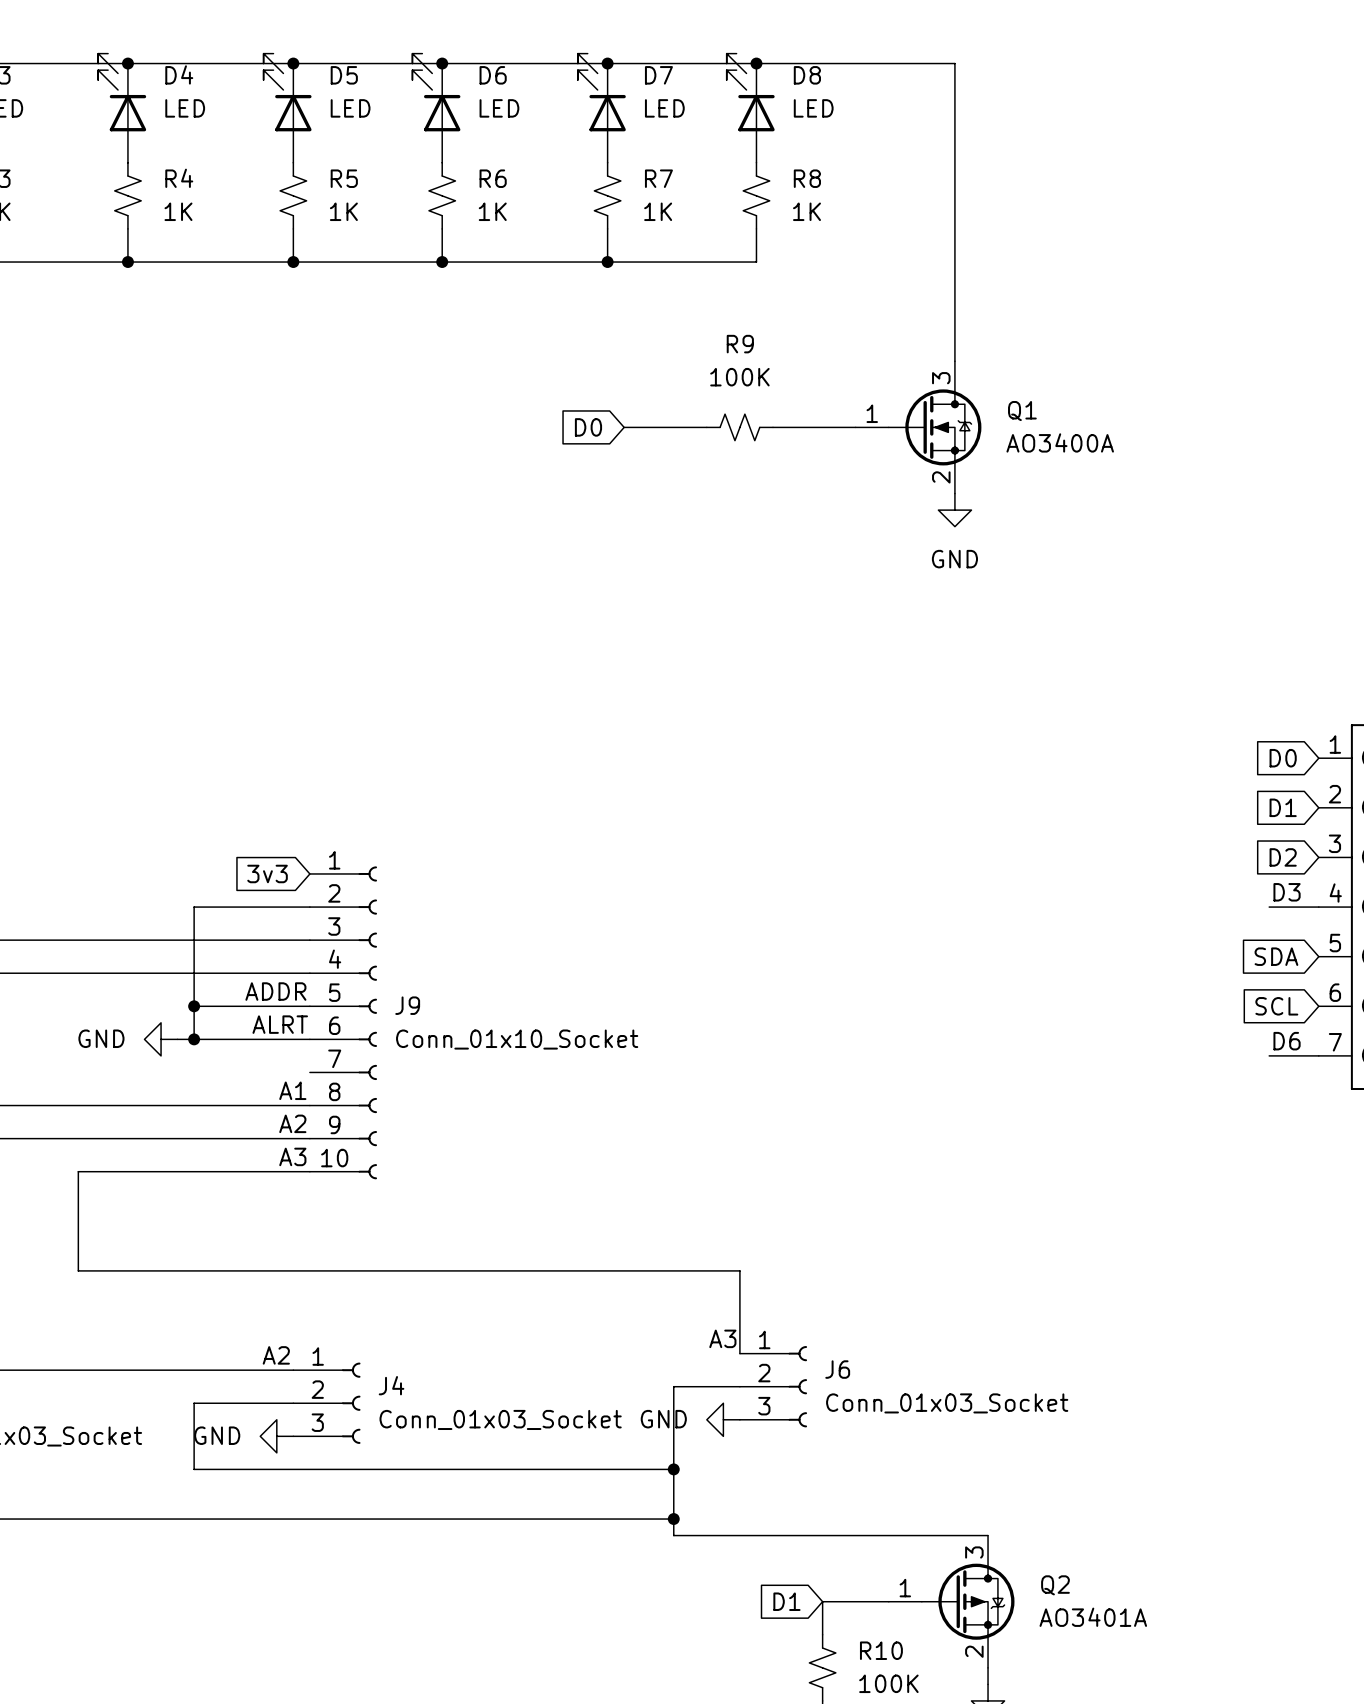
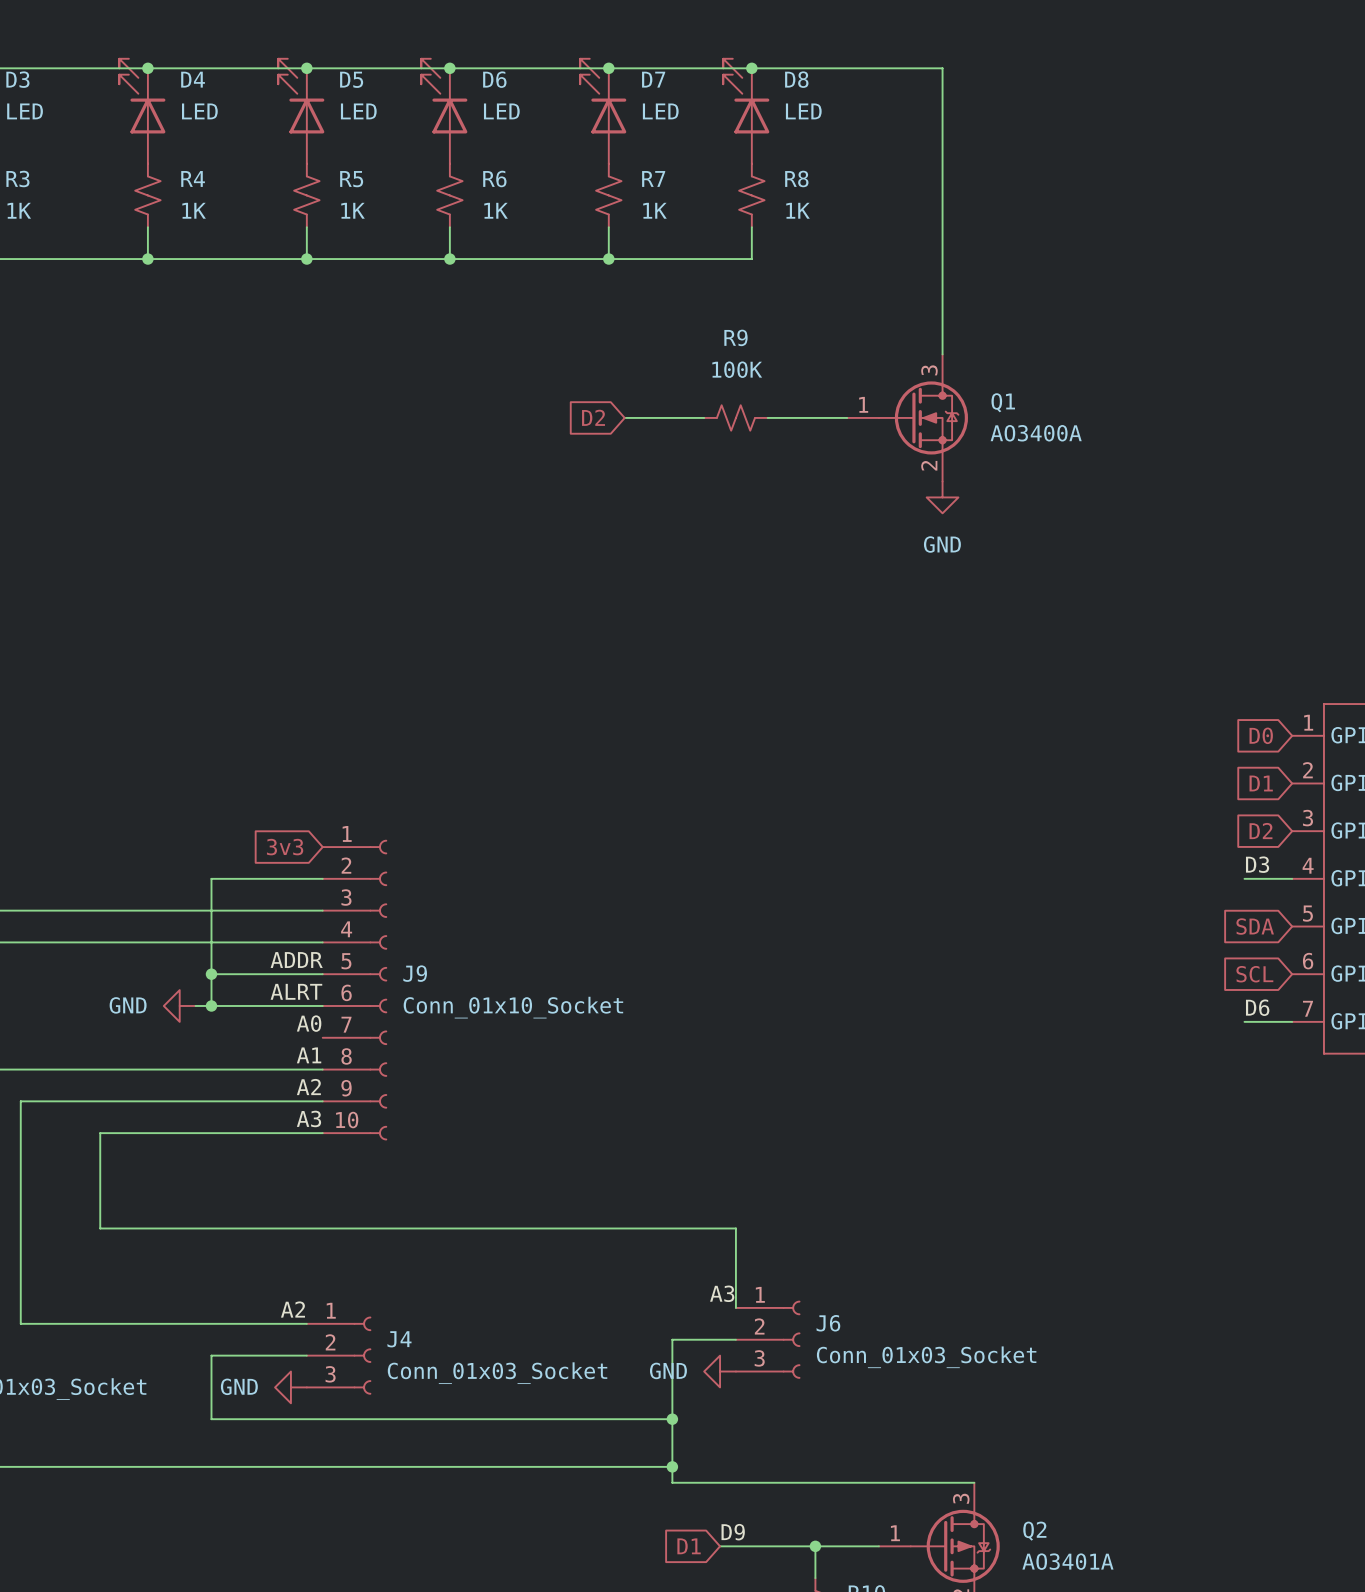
global label: D0 (588, 427) -> D2 (593, 417)
label: none -> A0 (309, 1023)
label: none -> D9 (733, 1532)
wire: none -> (720, 1546) (815, 1546)
global label position: D1 (786, 1601) -> D1 (689, 1546)
junction: none -> (815, 1546)

